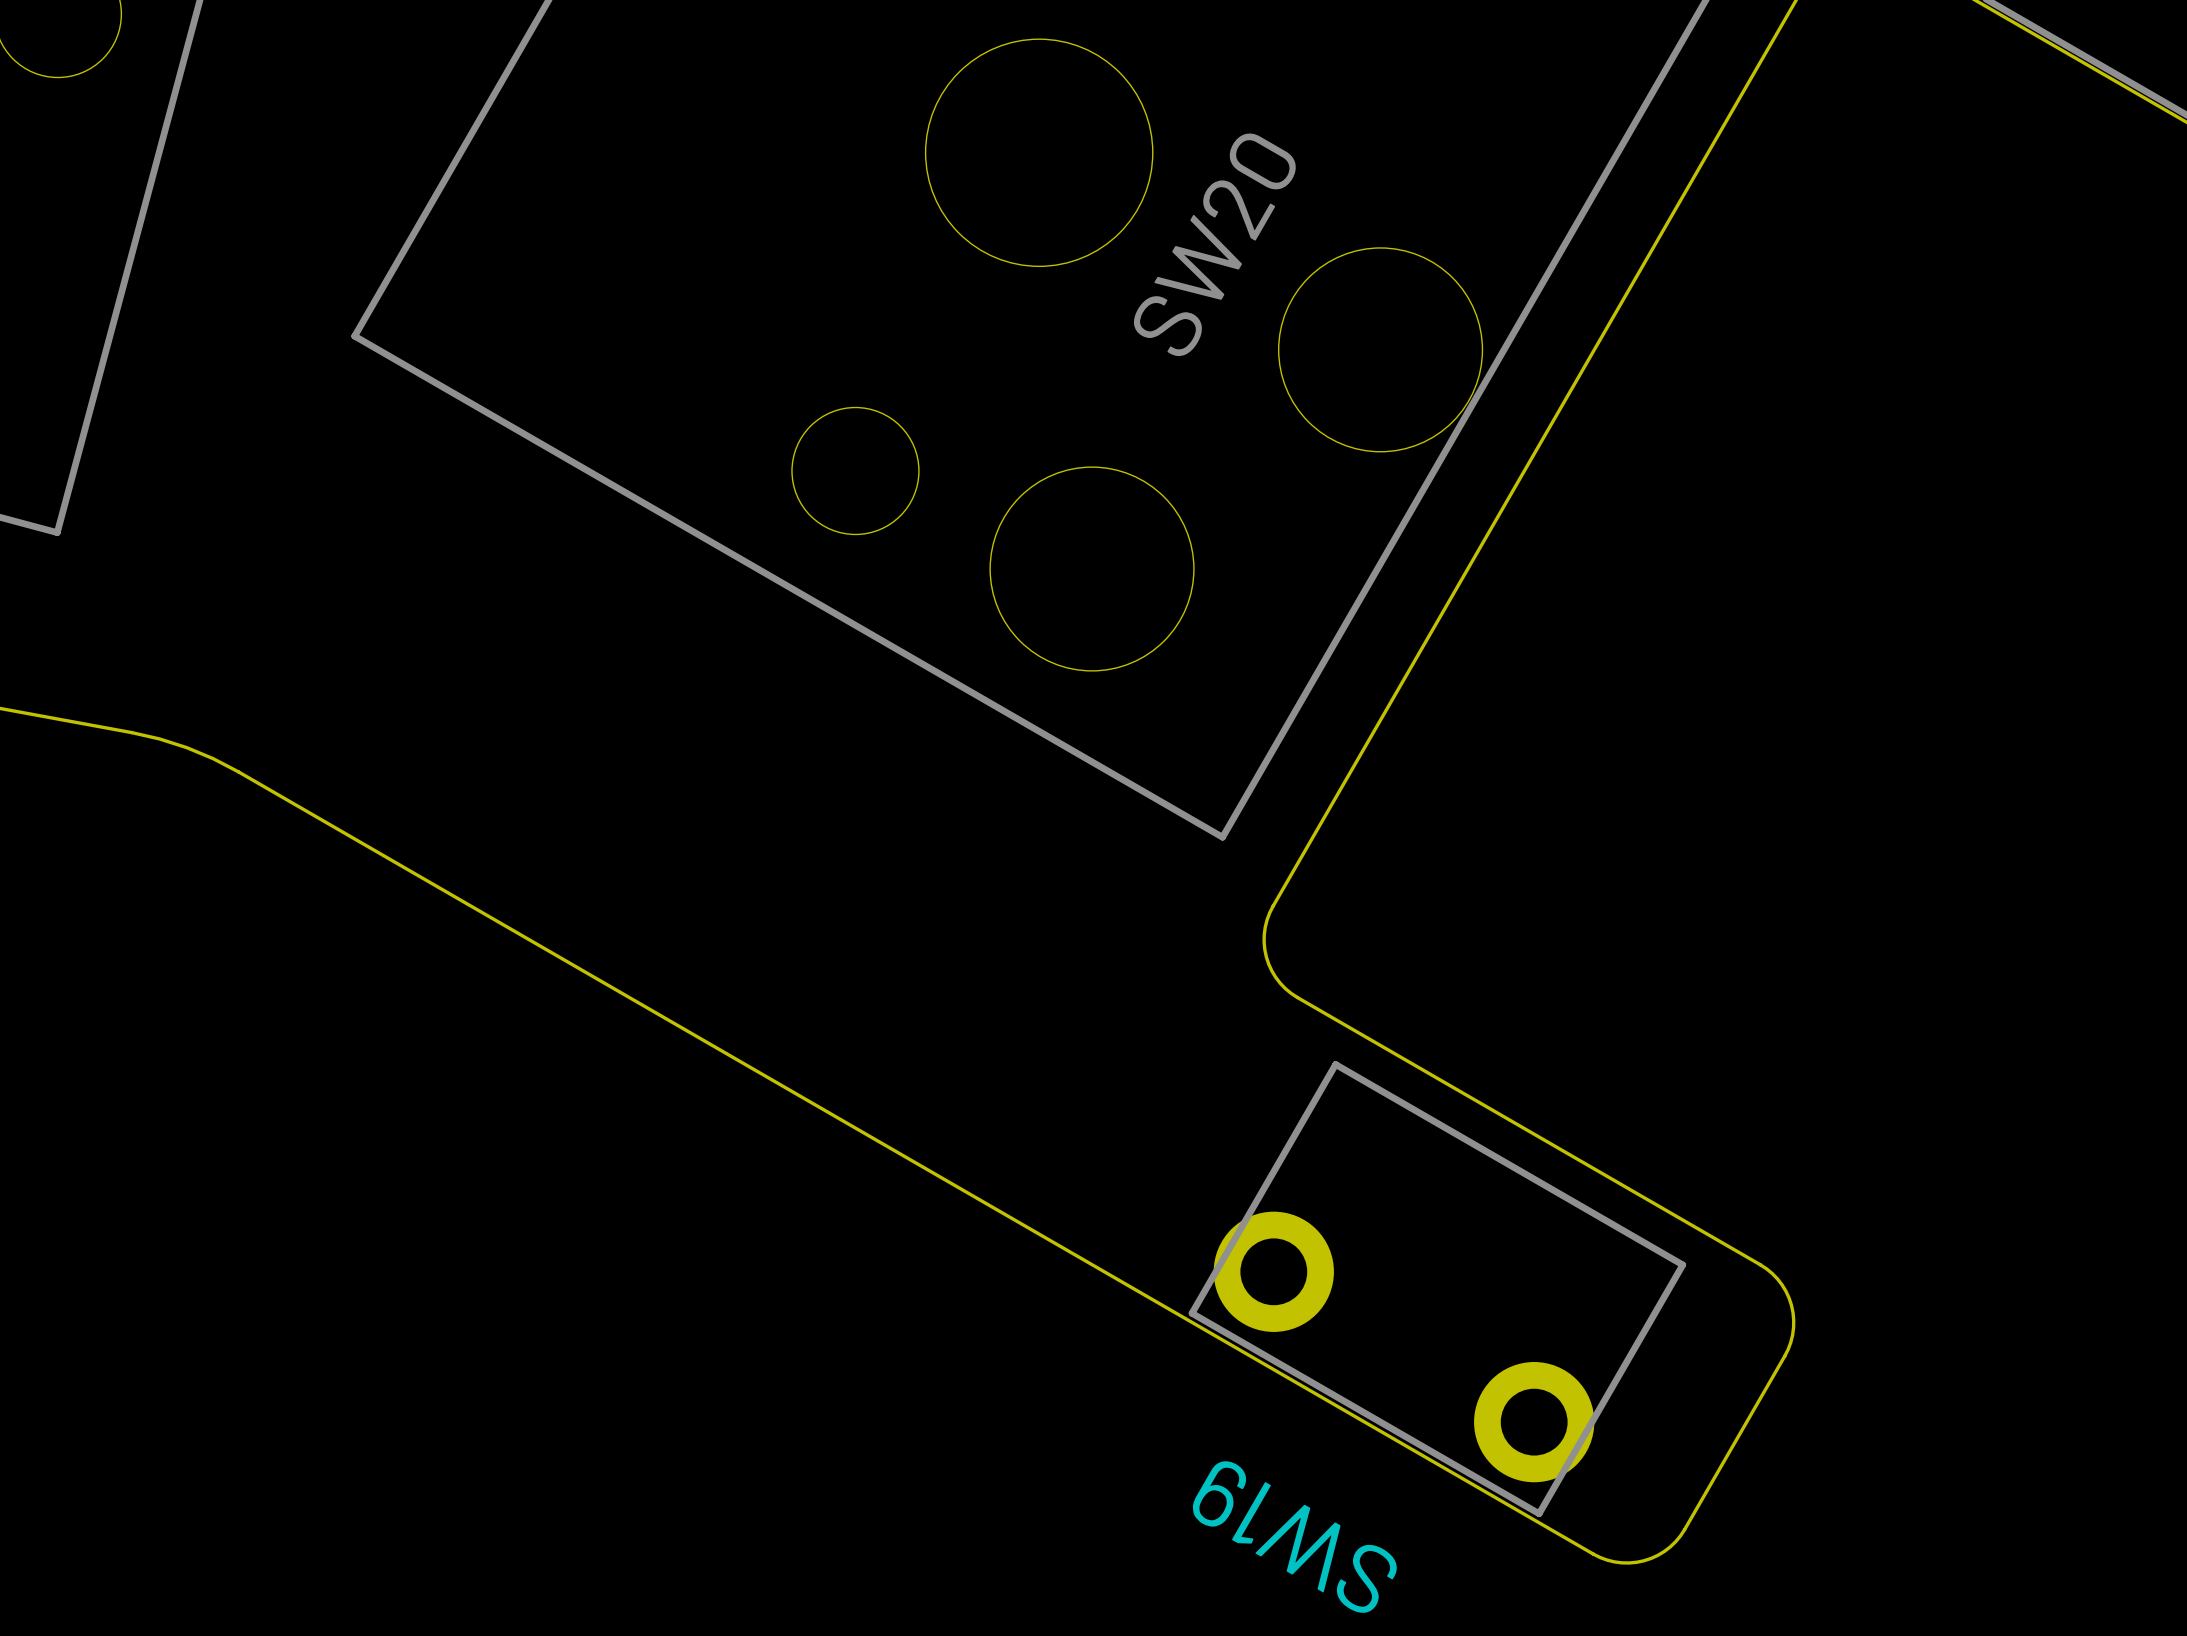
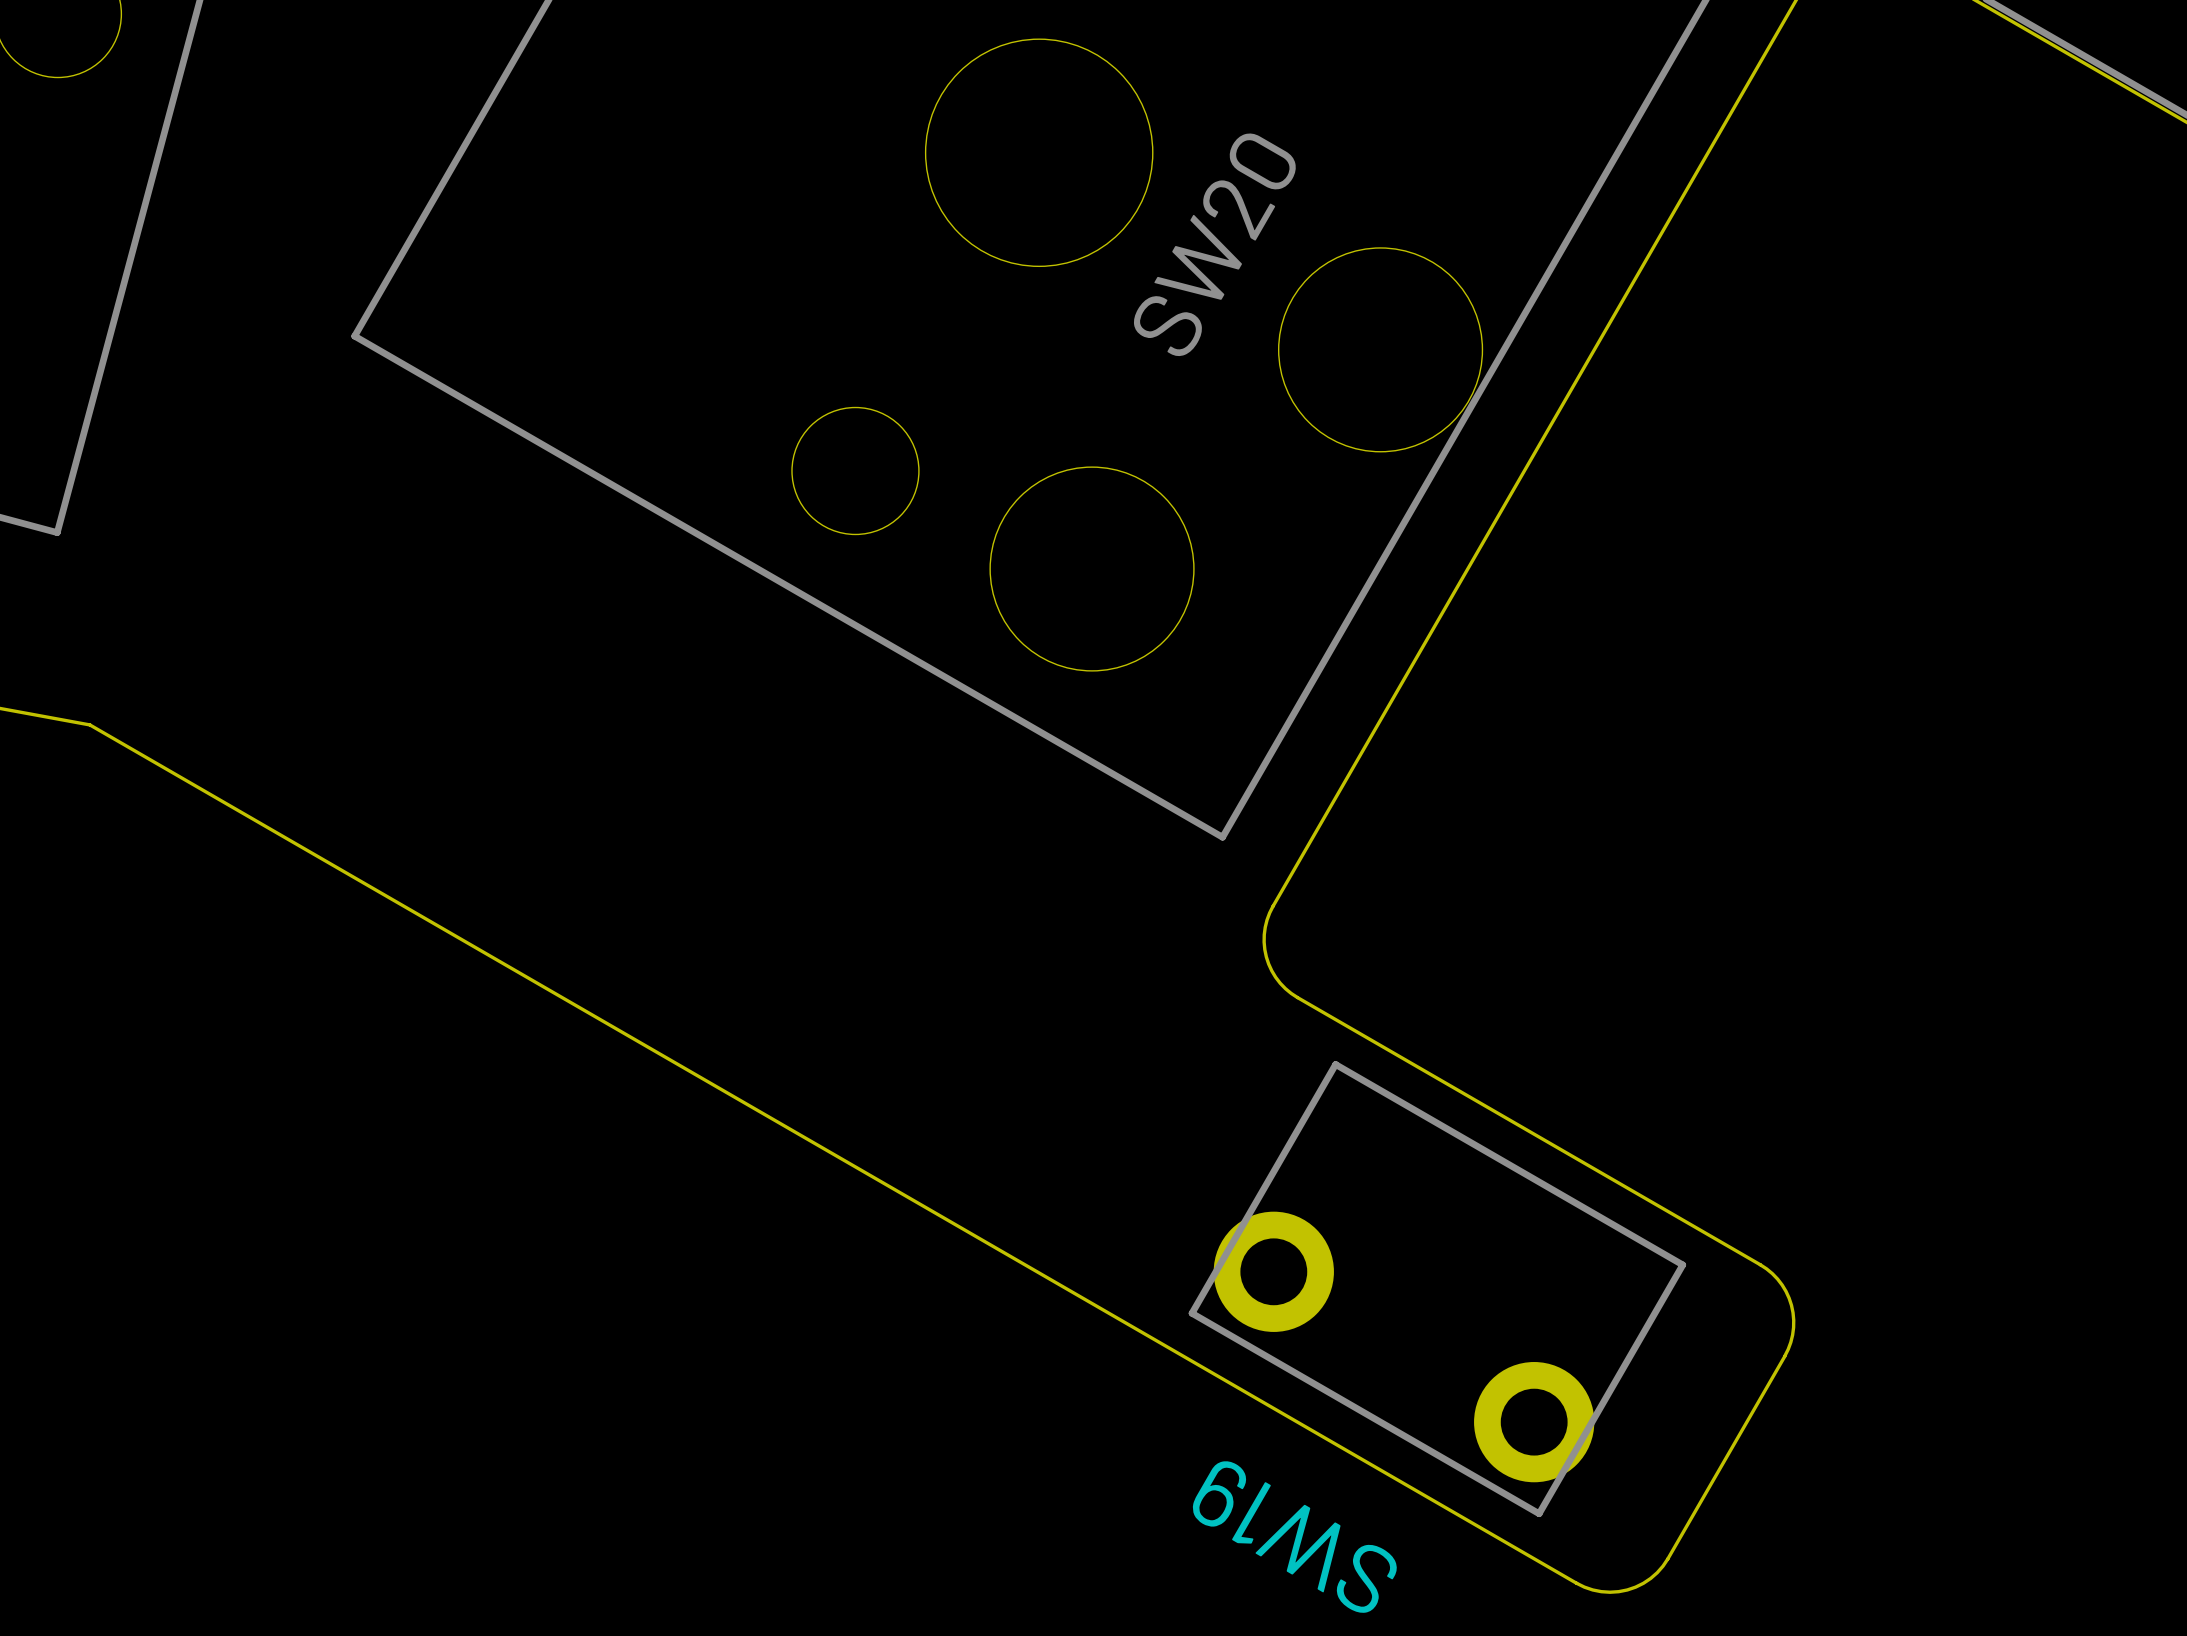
board edge: (89, 724) (159, 738) (186, 747) (238, 771) (1600, 1557) (1621, 1562) (1644, 1560) (1657, 1555) (1675, 1541) (1684, 1529) (1784, 1356) -> (89, 724) (1584, 1587) (1610, 1592) (1627, 1589) (1643, 1583) (1663, 1566) (1784, 1356)

